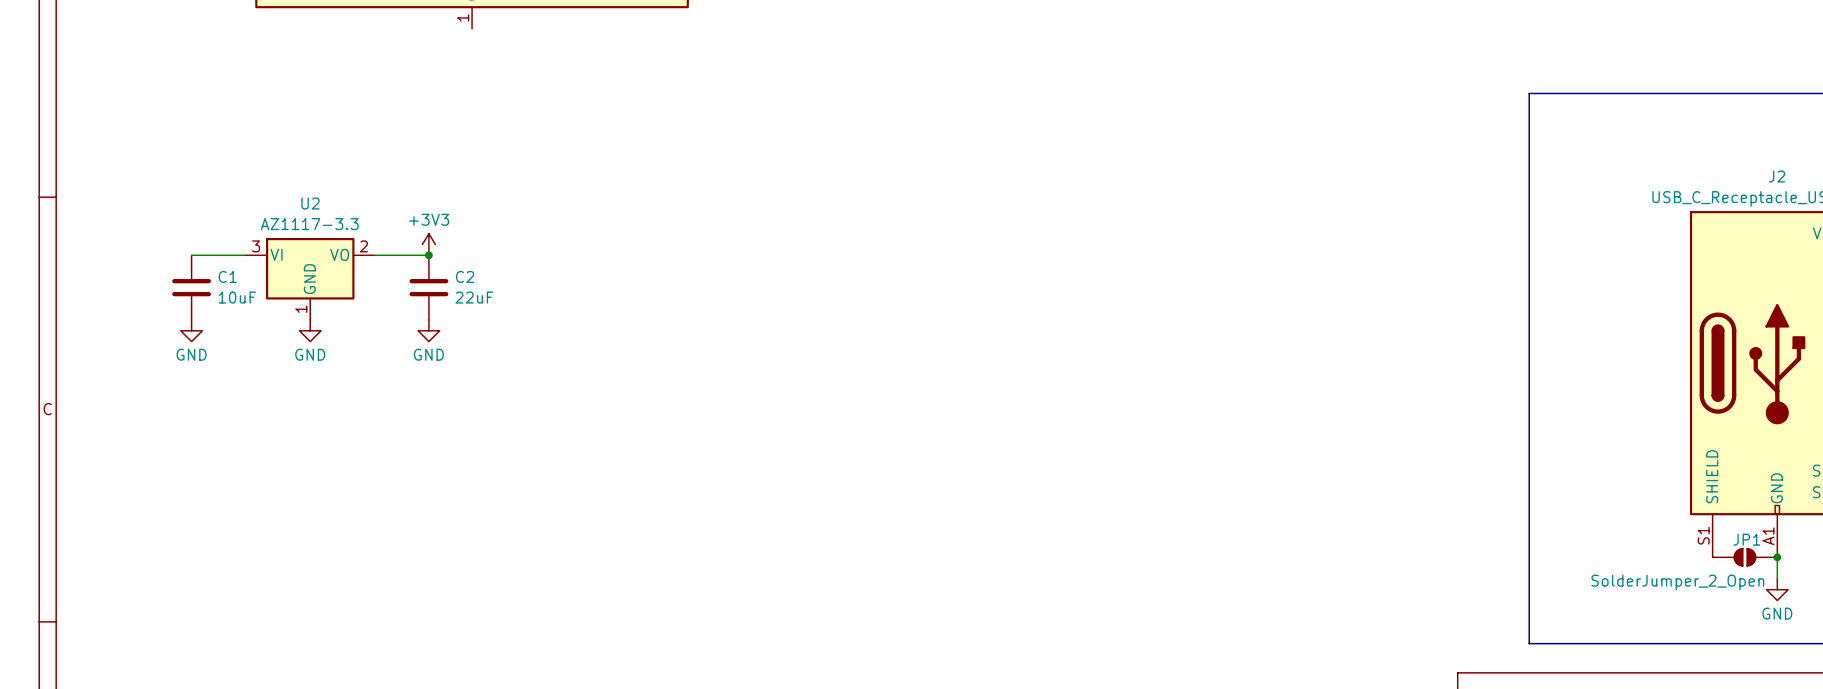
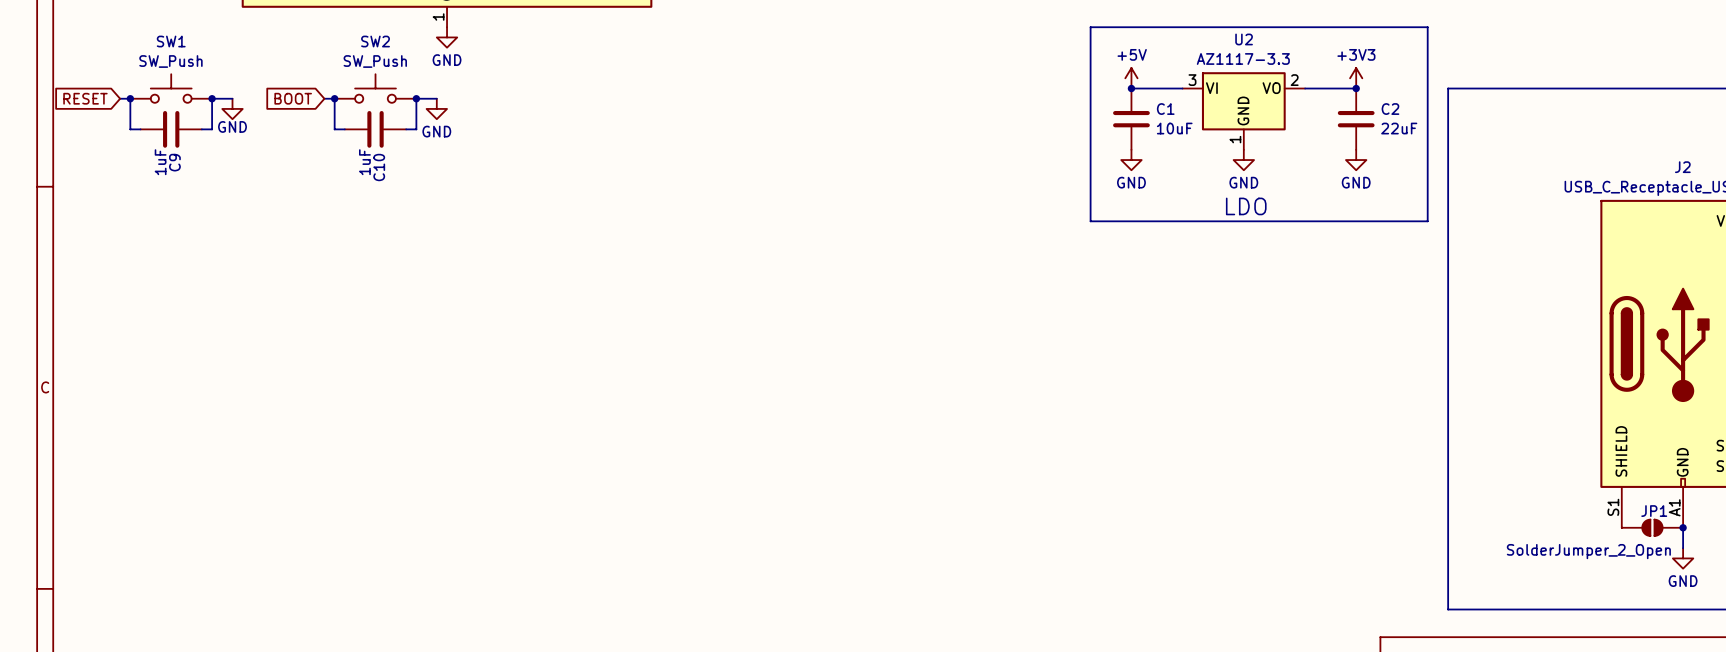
line: none -> (1090, 27) (1427, 27) (1427, 221) (1090, 221) (1090, 27)
power symbol: none -> GND (447, 37)
power symbol: none -> +5V (1131, 78)
power symbol: none -> +3V3 (1356, 78)
SW1: none -> SW_Push (171, 88)
SW2: none -> SW_Push (375, 88)
wire: none -> (1131, 88) (1182, 88)
junction: none -> (1131, 88)
wire: none -> (1305, 88) (1356, 88)
junction: none -> (1356, 88)
global label: none -> RESET (85, 98)
wire: none -> (120, 98) (130, 98) (130, 129) (140, 129)
junction: none -> (130, 98)
junction: none -> (212, 98)
wire: none -> (232, 98) (212, 98) (212, 129) (201, 129)
global label: none -> BOOT (293, 98)
wire: none -> (324, 98) (334, 98) (334, 129) (344, 129)
junction: none -> (334, 98)
junction: none -> (416, 98)
wire: none -> (436, 98) (416, 98) (416, 129) (406, 129)
power symbol: none -> GND (232, 108)
power symbol: none -> GND (436, 108)
C9: none -> 1uF (171, 129)
C10: none -> 1uF (375, 129)
power symbol: none -> GND (1131, 160)
power symbol: none -> GND (1243, 160)
power symbol: none -> GND (1356, 160)
text: none -> LDO (1246, 206)
power symbol: +3V3 (428, 244) -> none
wire: (191, 255) (245, 255) -> none
wire: (374, 255) (428, 255) -> none
junction: (428, 255) -> none
U2 position: (310, 279) -> (1243, 110)
C1 position: (191, 287) -> (1131, 119)
C2 position: (428, 287) -> (1356, 119)
power symbol: GND (191, 330) -> none
power symbol: GND (310, 330) -> none
power symbol: GND (428, 330) -> none

